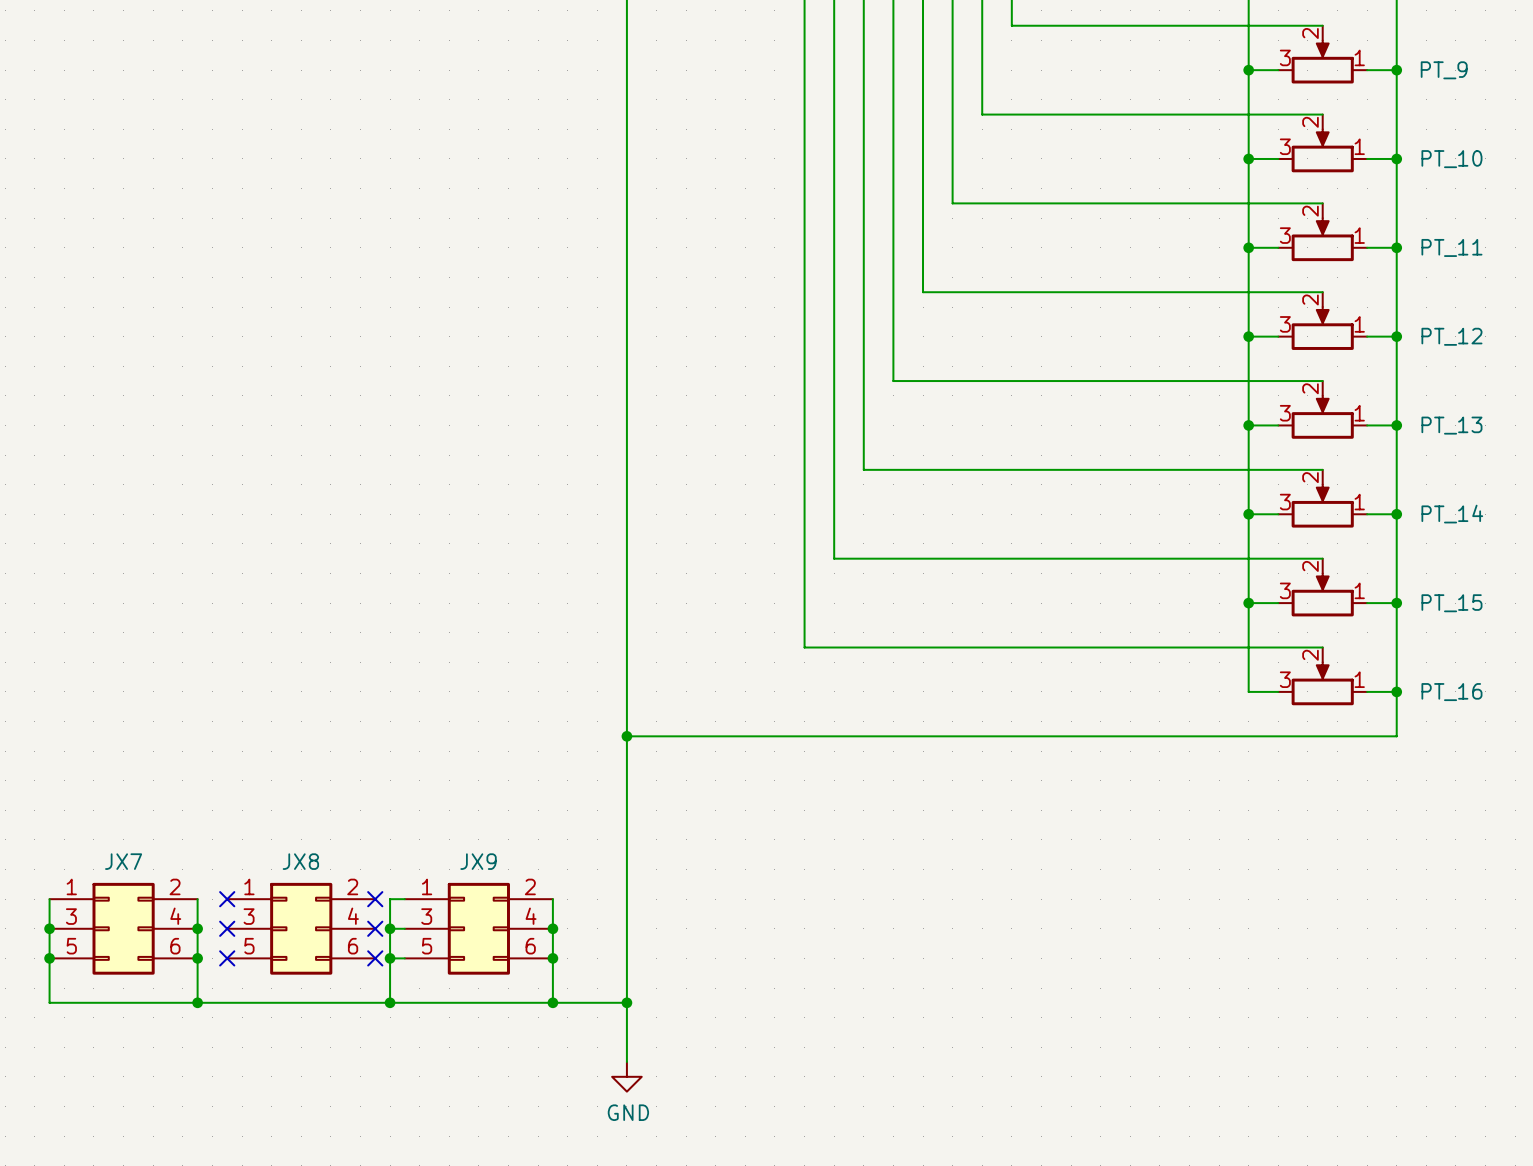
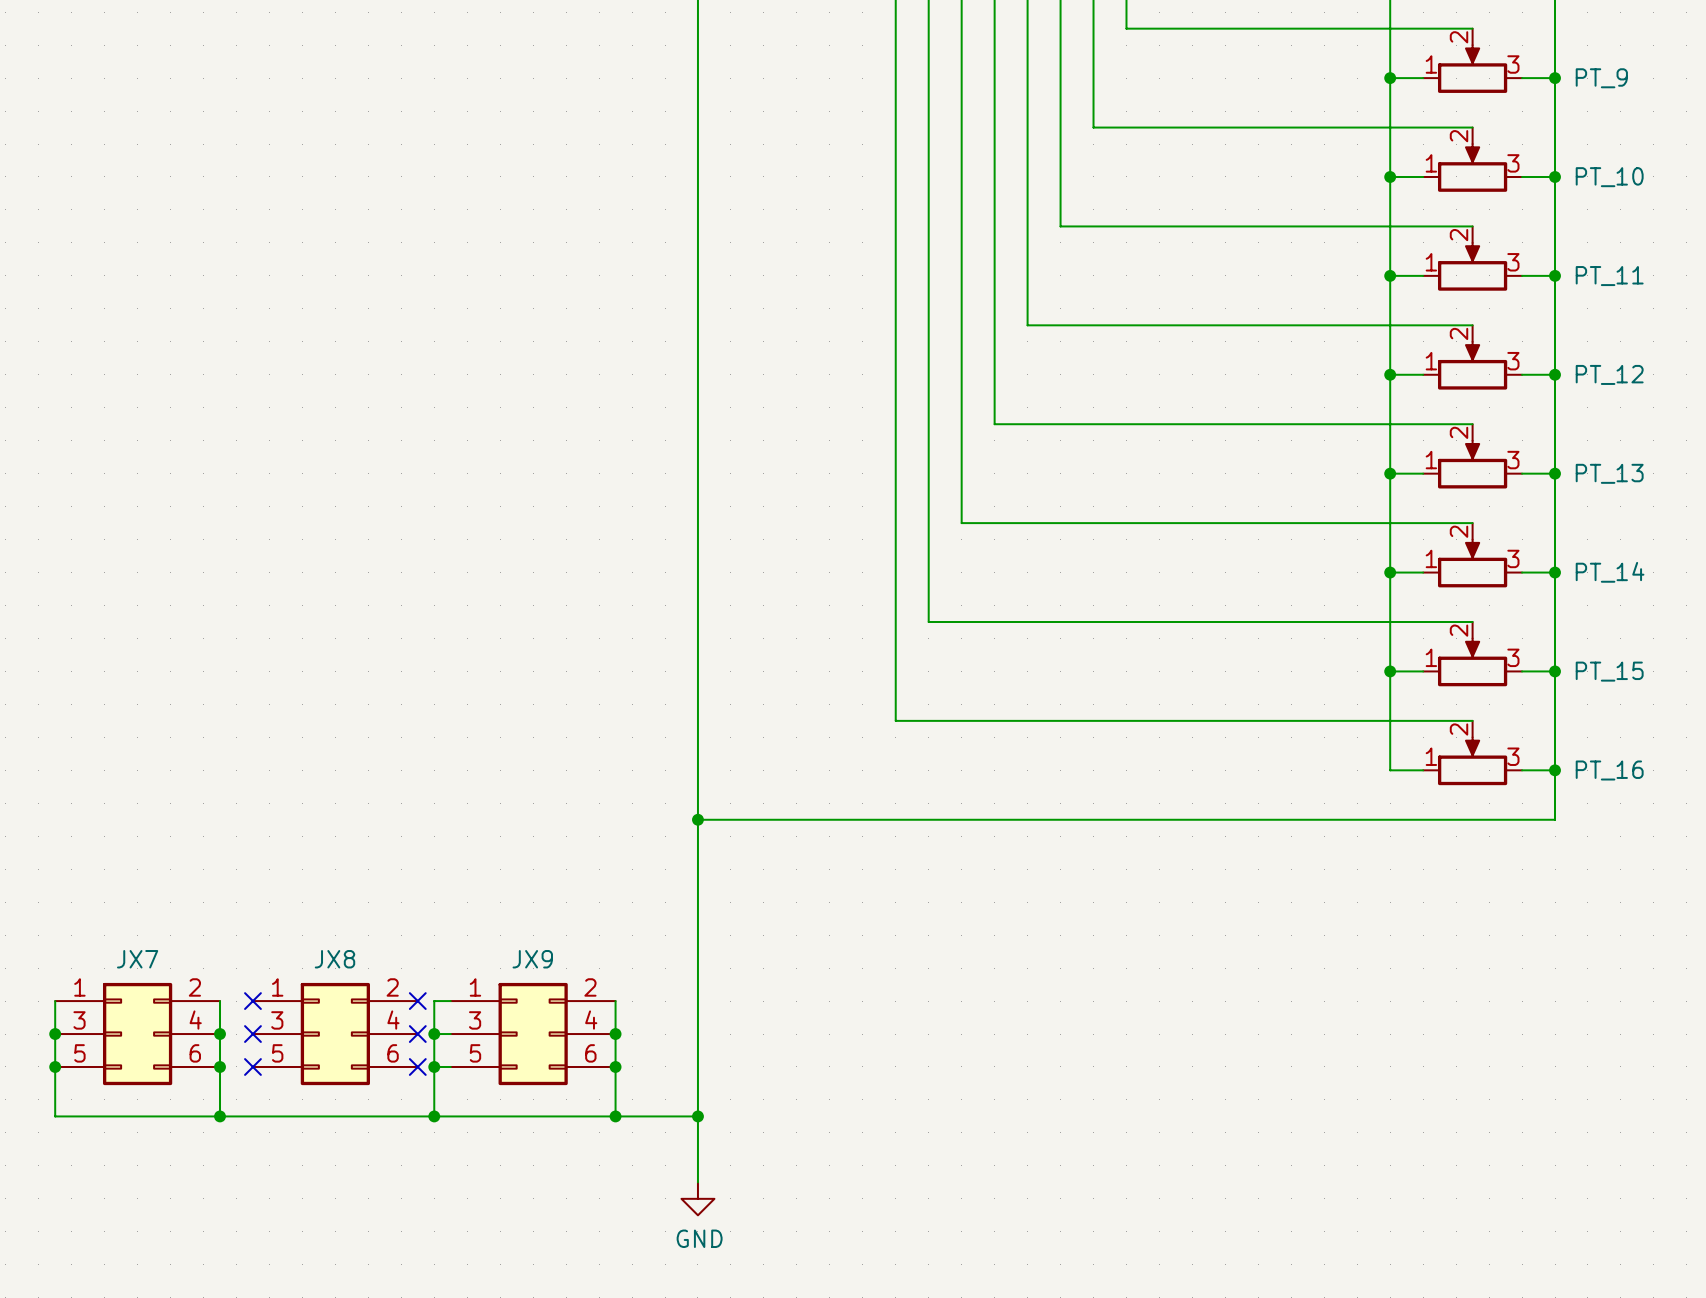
PT_9 flip: as is (1322, 62) -> left-right (1472, 69)
PT_10 flip: as is (1322, 150) -> left-right (1472, 167)
PT_11 flip: as is (1322, 239) -> left-right (1472, 266)
PT_12 flip: as is (1322, 328) -> left-right (1472, 365)
PT_13 flip: as is (1322, 417) -> left-right (1472, 464)
PT_14 flip: as is (1322, 506) -> left-right (1472, 563)
PT_15 flip: as is (1322, 594) -> left-right (1472, 662)
PT_16 flip: as is (1322, 683) -> left-right (1472, 761)

